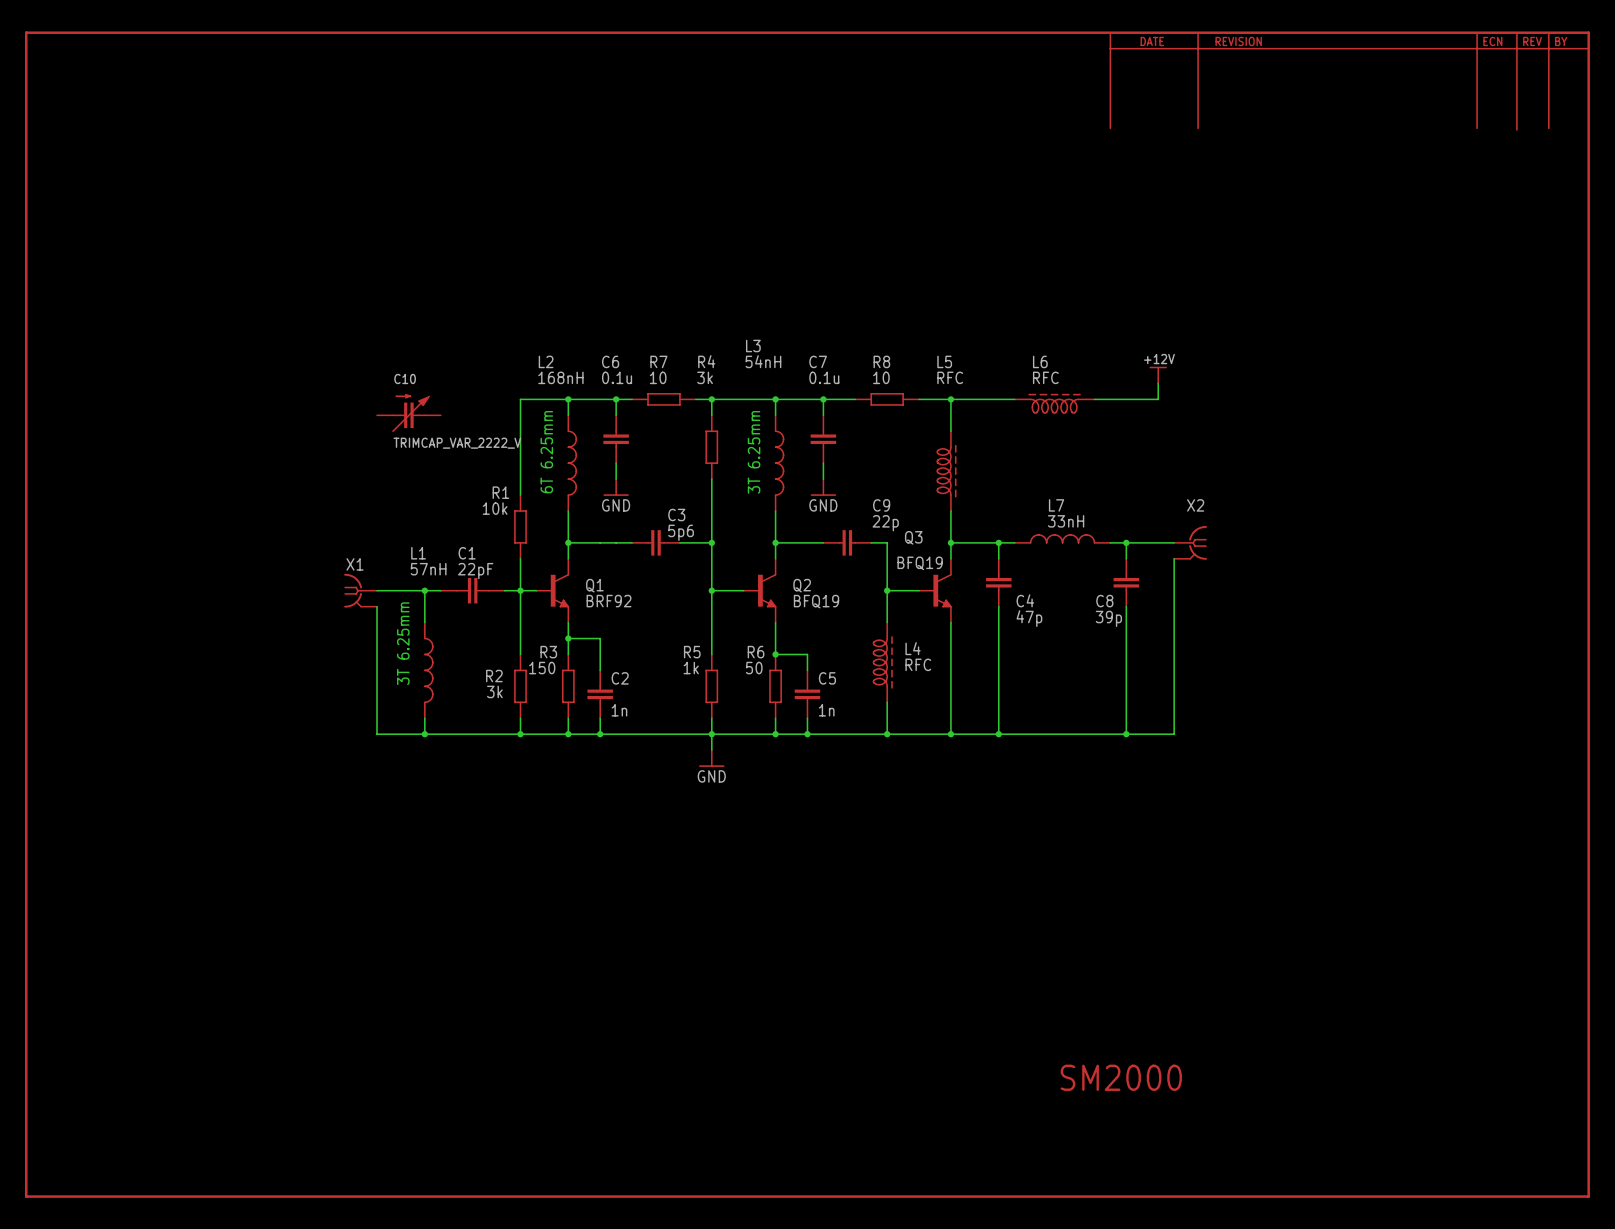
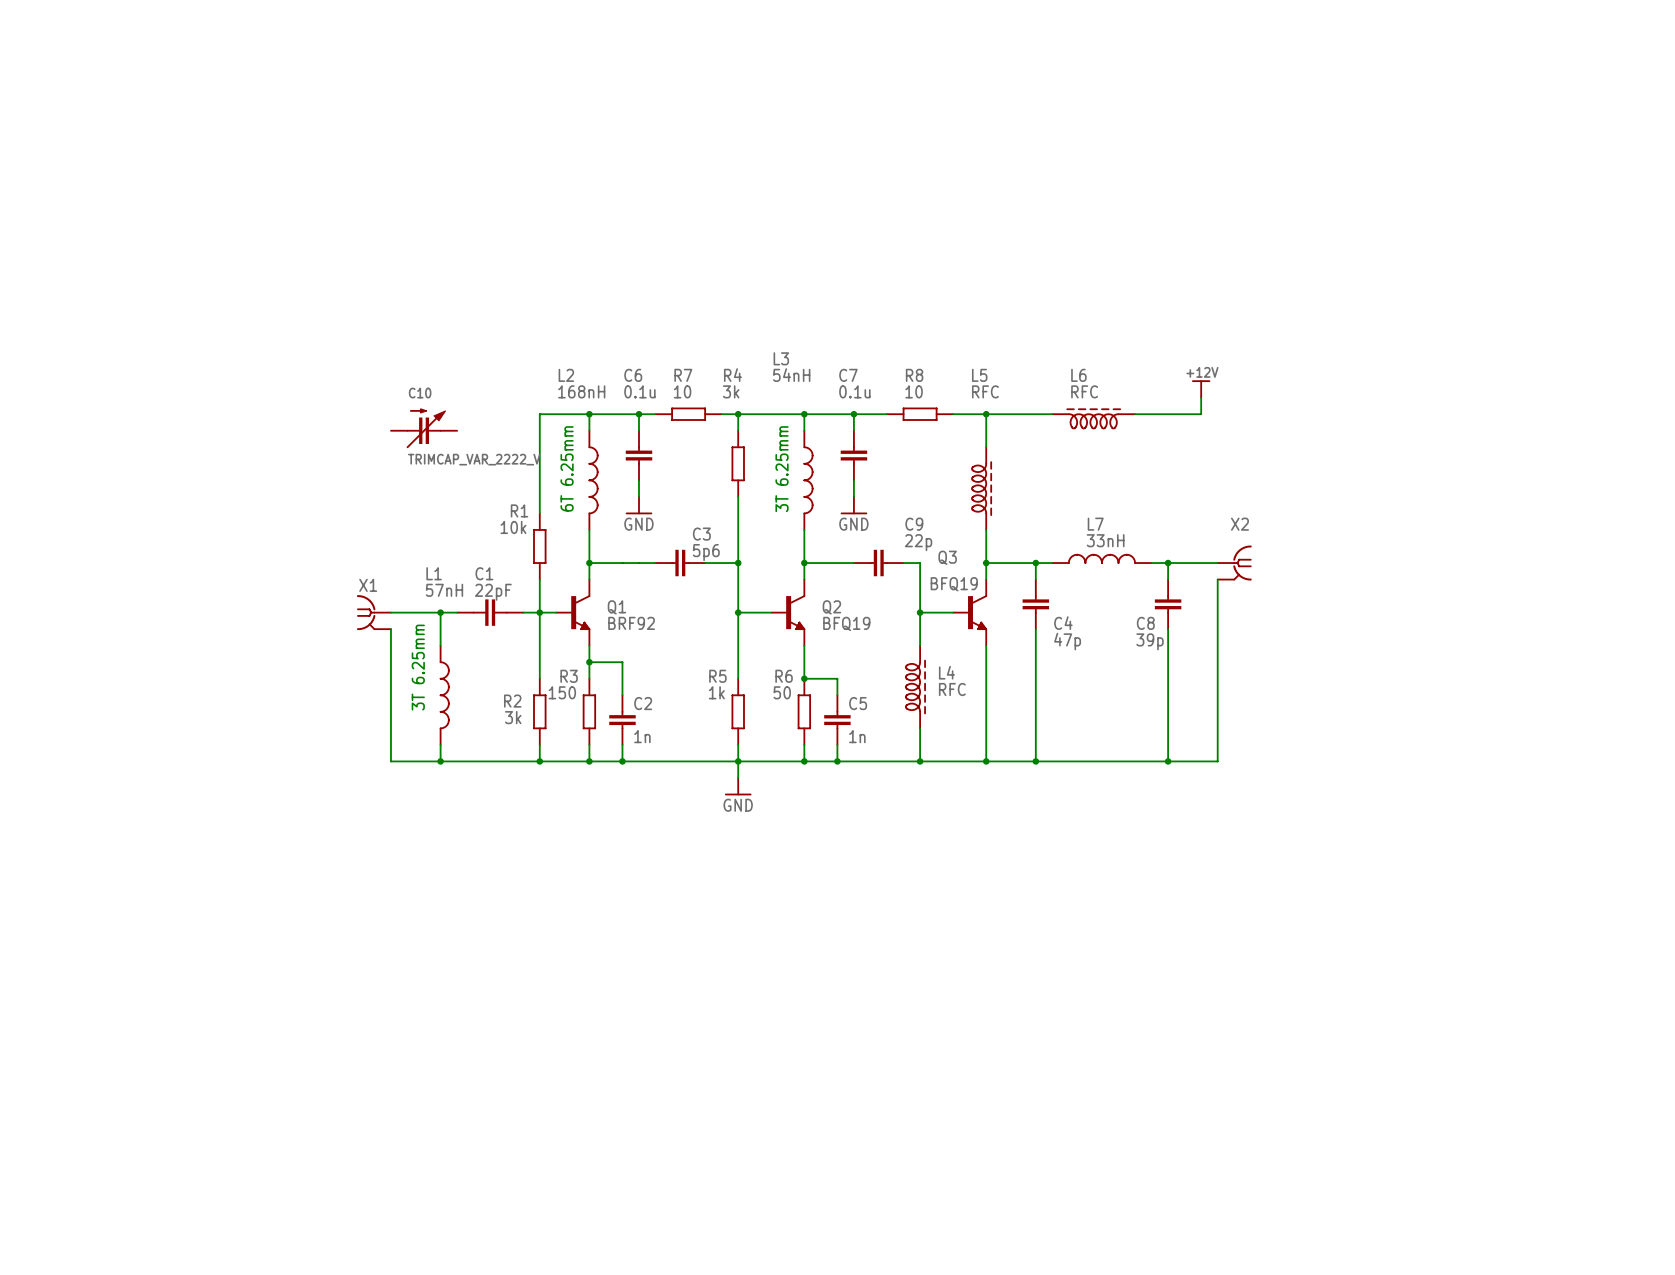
part: (1349, 81) -> none
part: (807, 614) -> none
text: SM2000 (1121, 1077) -> none

